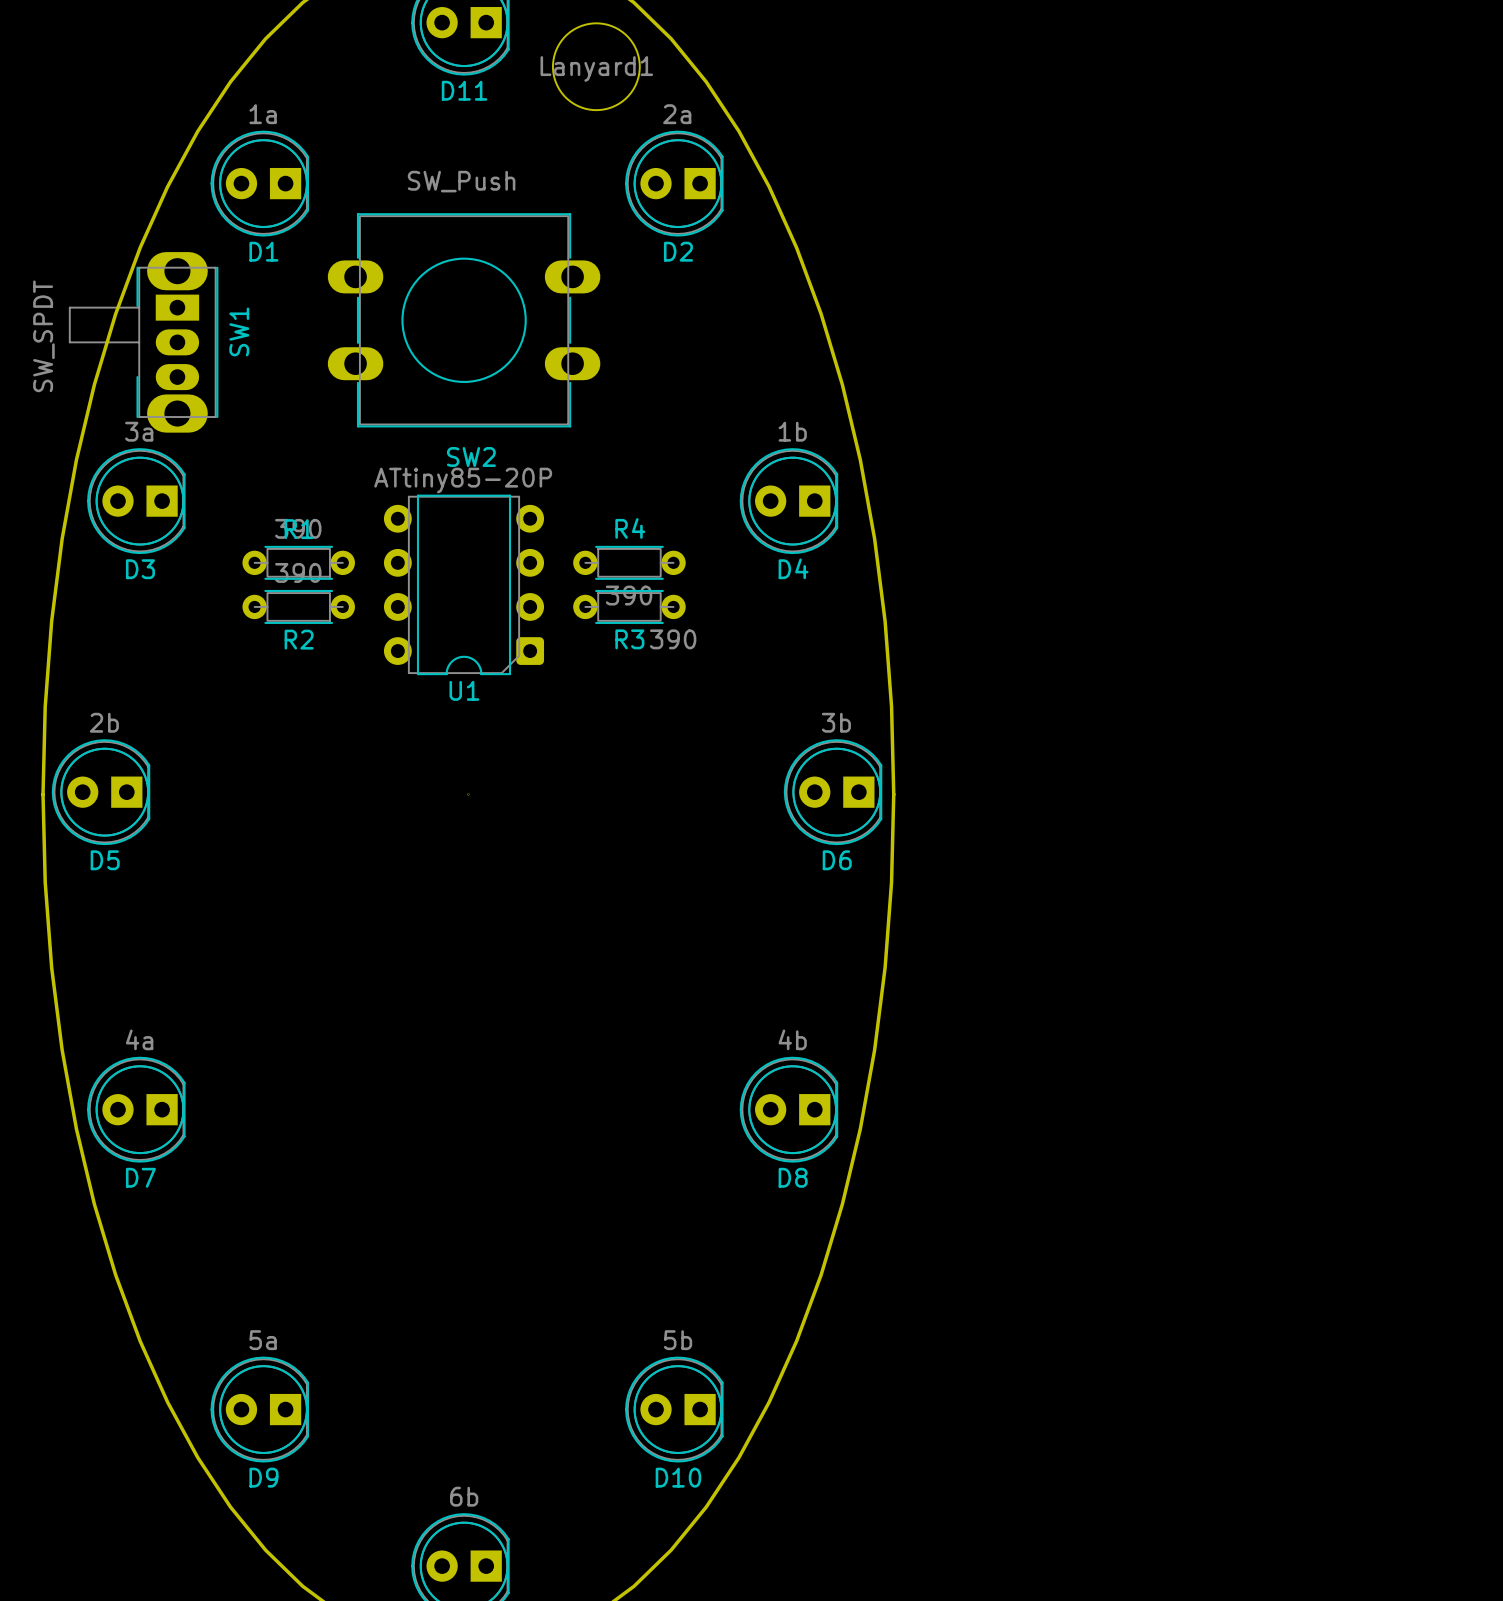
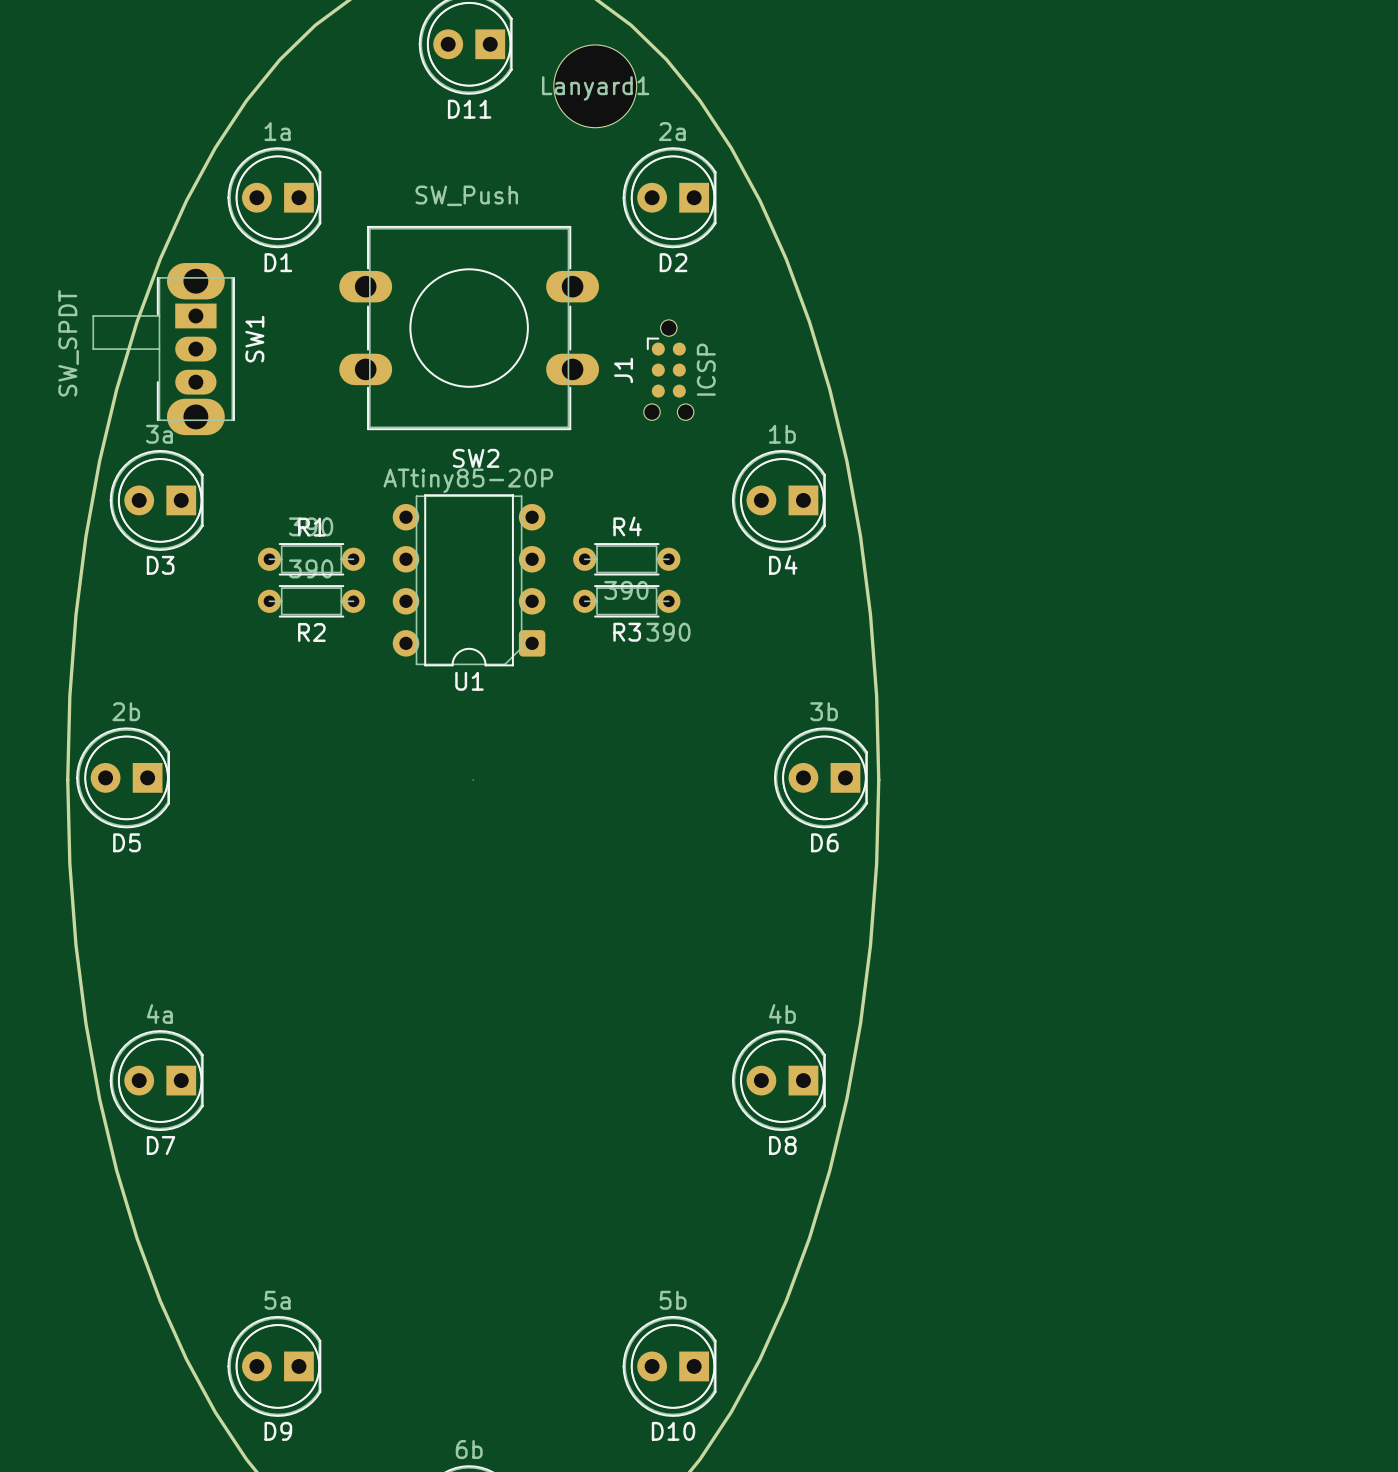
J1: none -> ICSP (668, 370)

